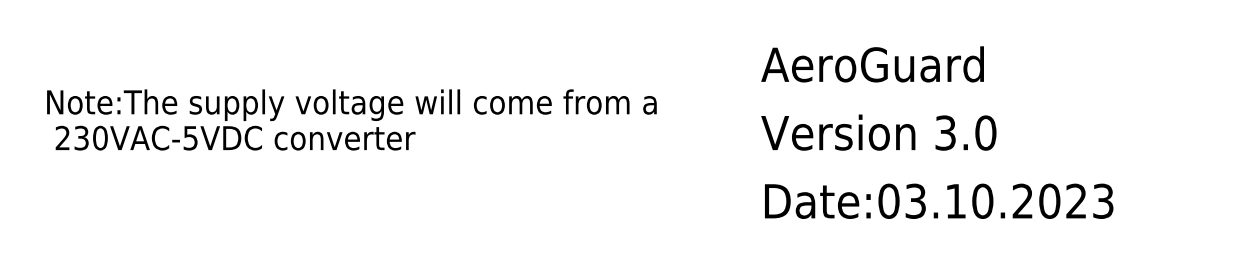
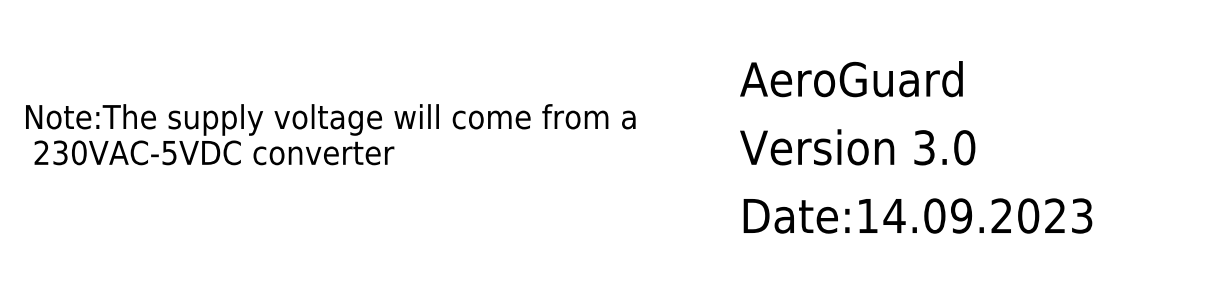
text: Date:03.10.2023 (939, 201) -> Date:14.09.2023 (918, 216)

